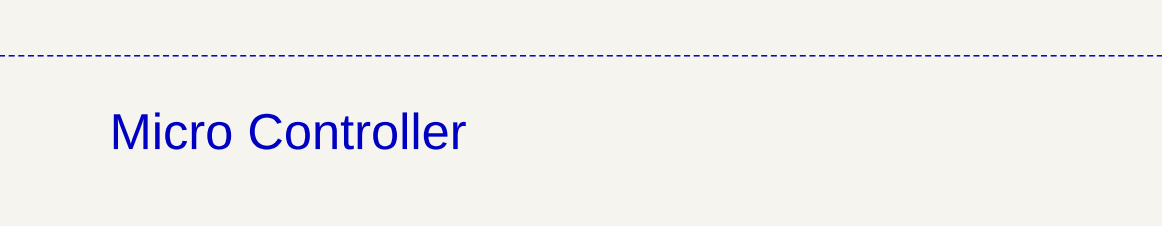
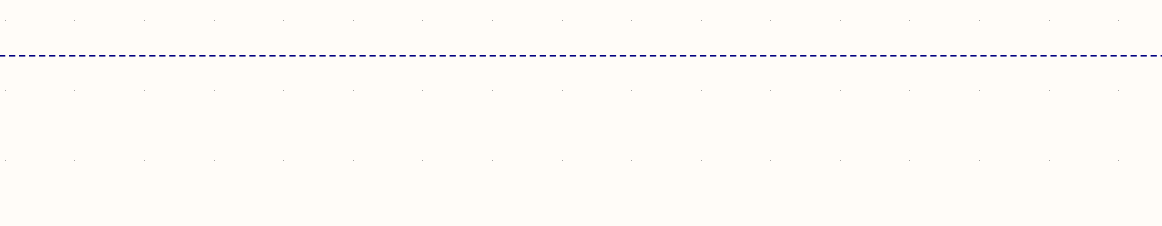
text: Micro Controller (289, 130) -> none

